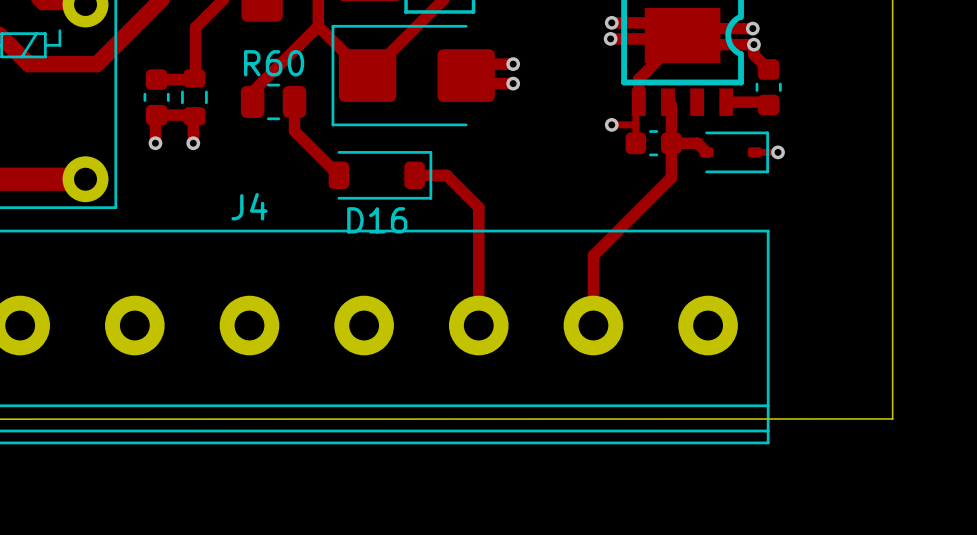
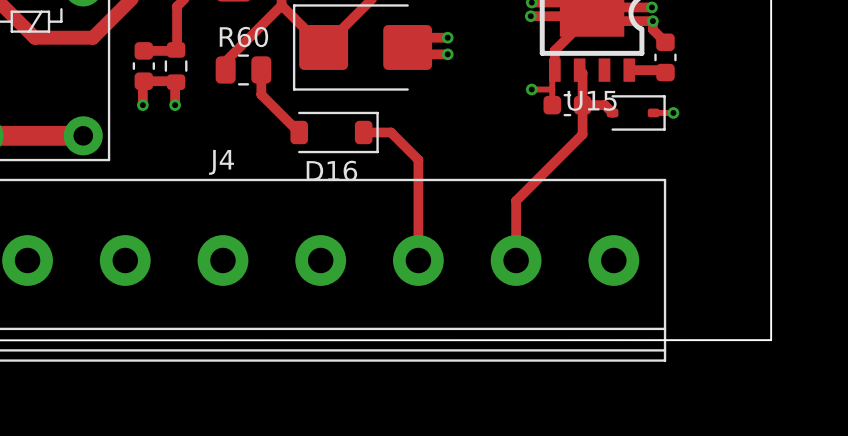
U15 name: none -> U15 (592, 100)

